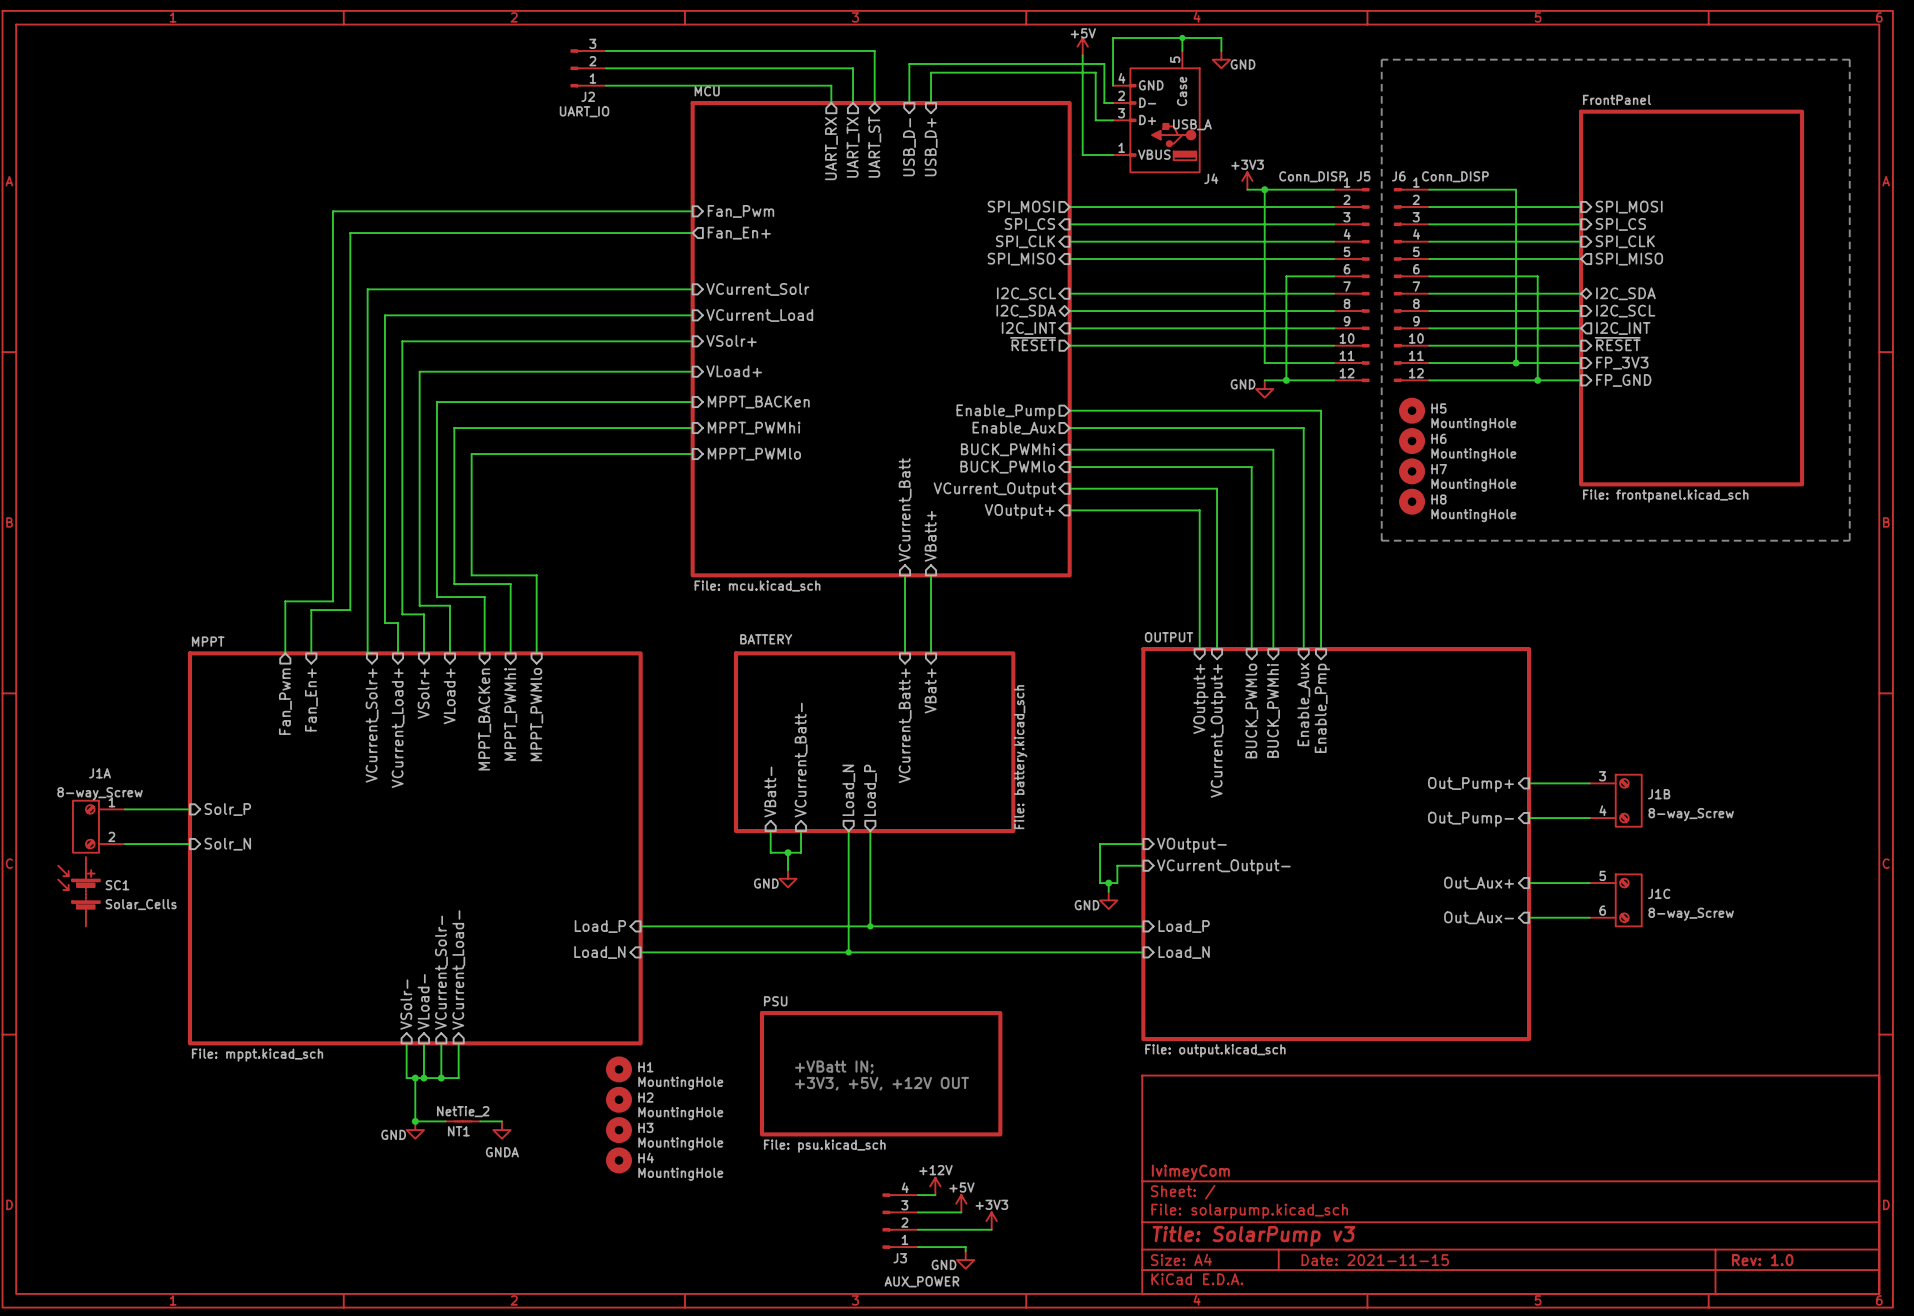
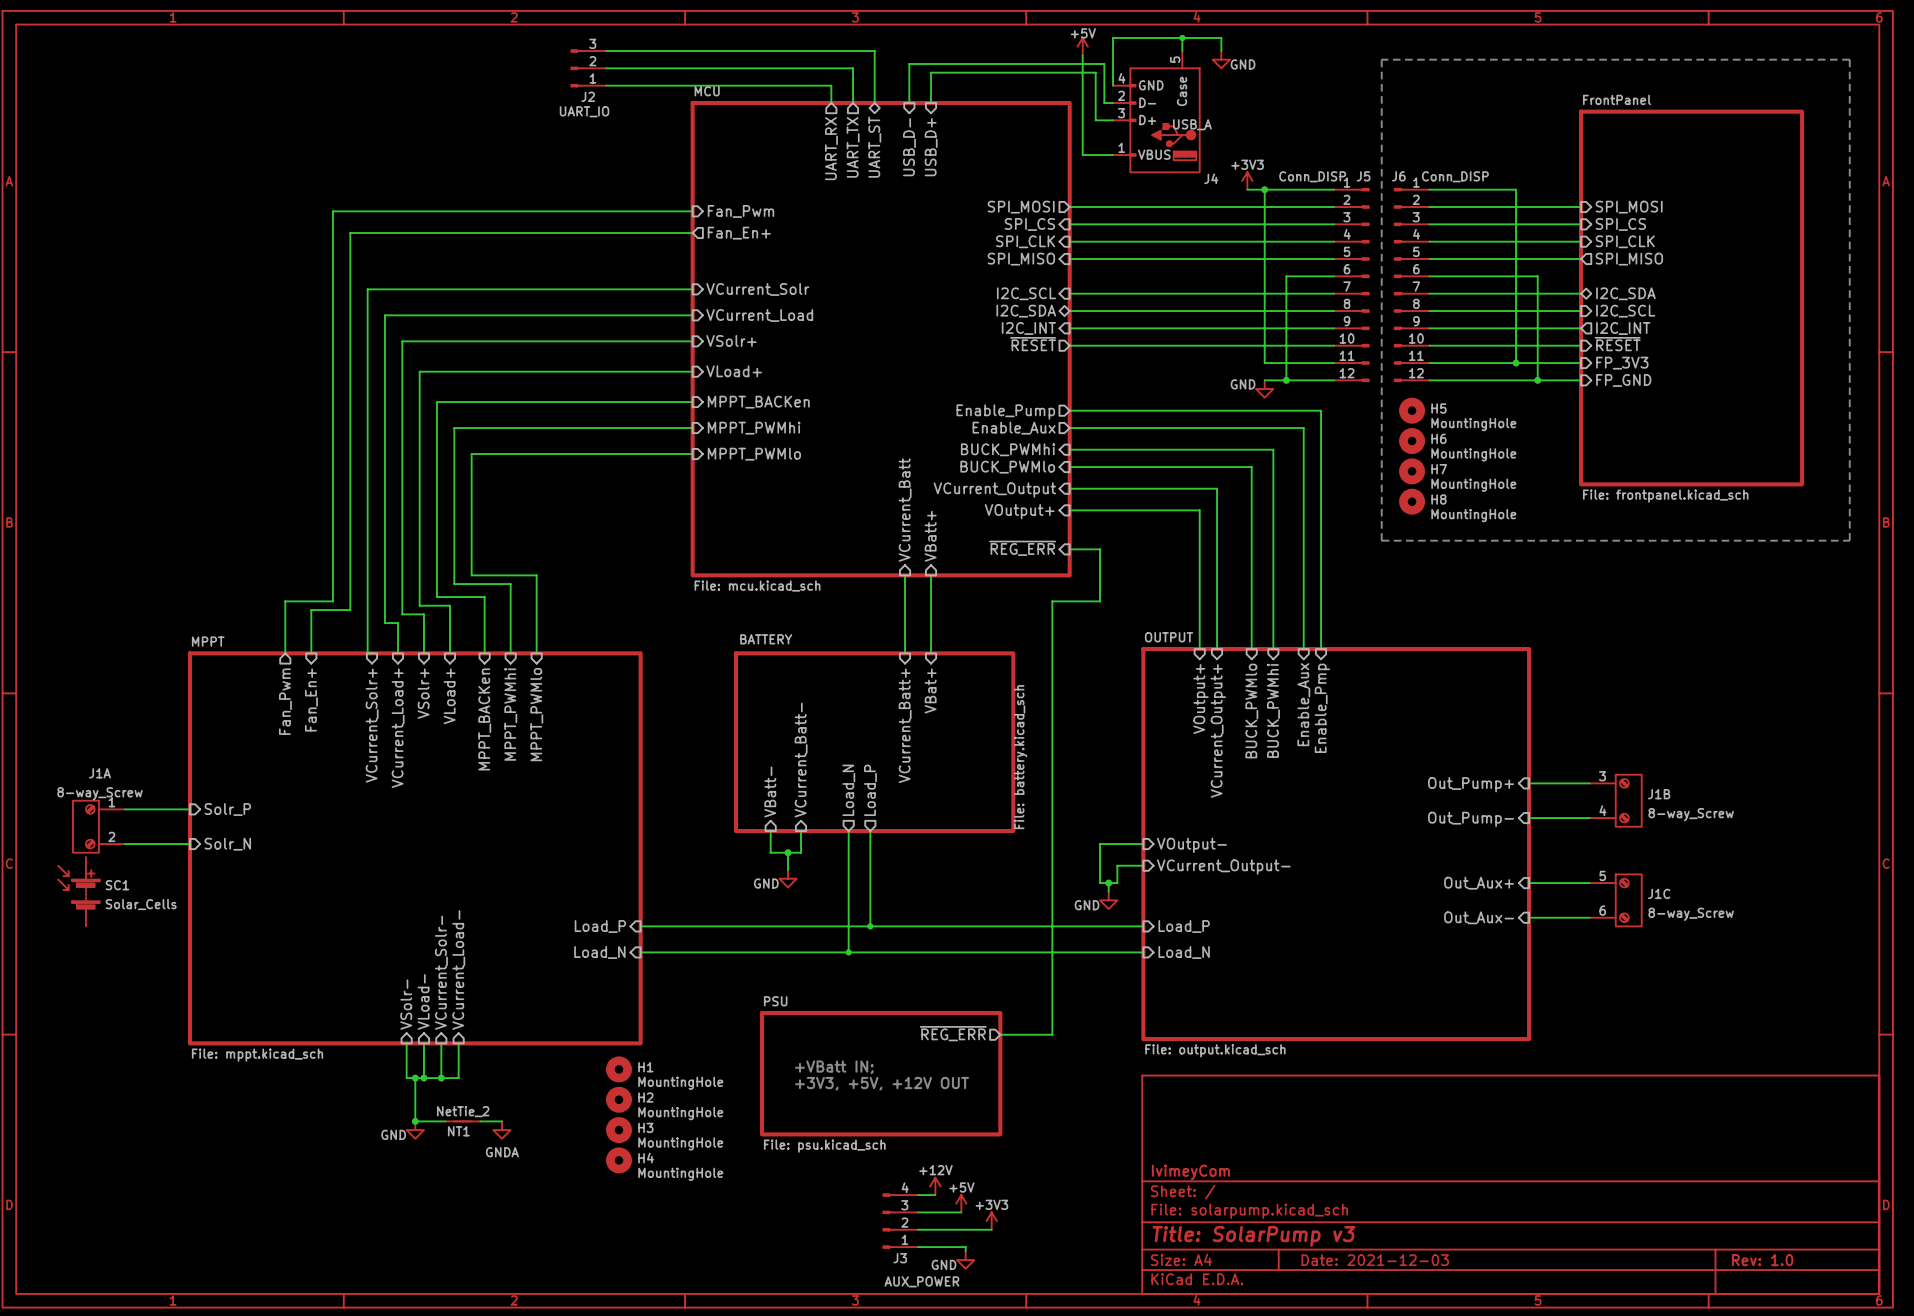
sheet pin: none -> ~{REG_ERR} (1022, 548)
wire: none -> (1069, 549) (1100, 549) (1100, 601) (1052, 601) (1052, 1034) (1000, 1034)
sheet pin: none -> ~{REG_ERR} (953, 1033)
title block: Date: 2021-11-15 (1375, 1260) -> Date: 2021-12-03 (1375, 1260)

